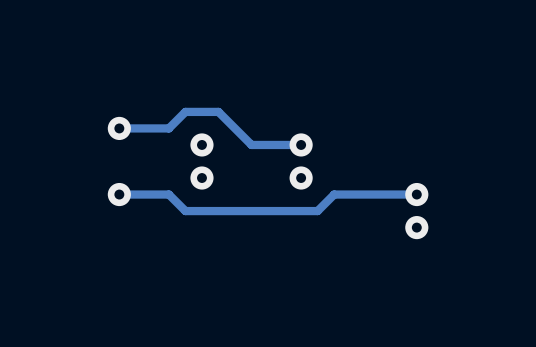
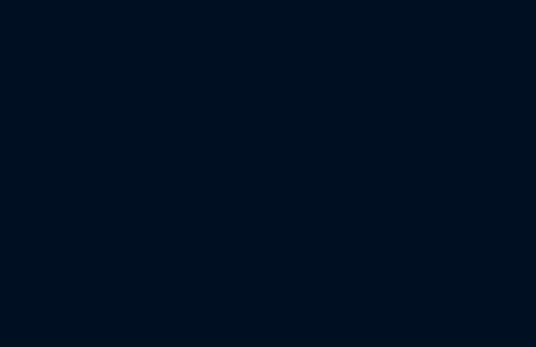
track: (119, 128) (168, 128) (185, 111) (218, 111) (251, 144) (301, 144) -> none
via: (119, 128) -> none
via: (201, 144) -> none
via: (301, 144) -> none
via: (201, 178) -> none
via: (301, 178) -> none
via: (119, 194) -> none
track: (416, 194) (334, 194) (317, 211) (185, 211) (168, 194) (119, 194) -> none
via: (416, 194) -> none
via: (416, 227) -> none

